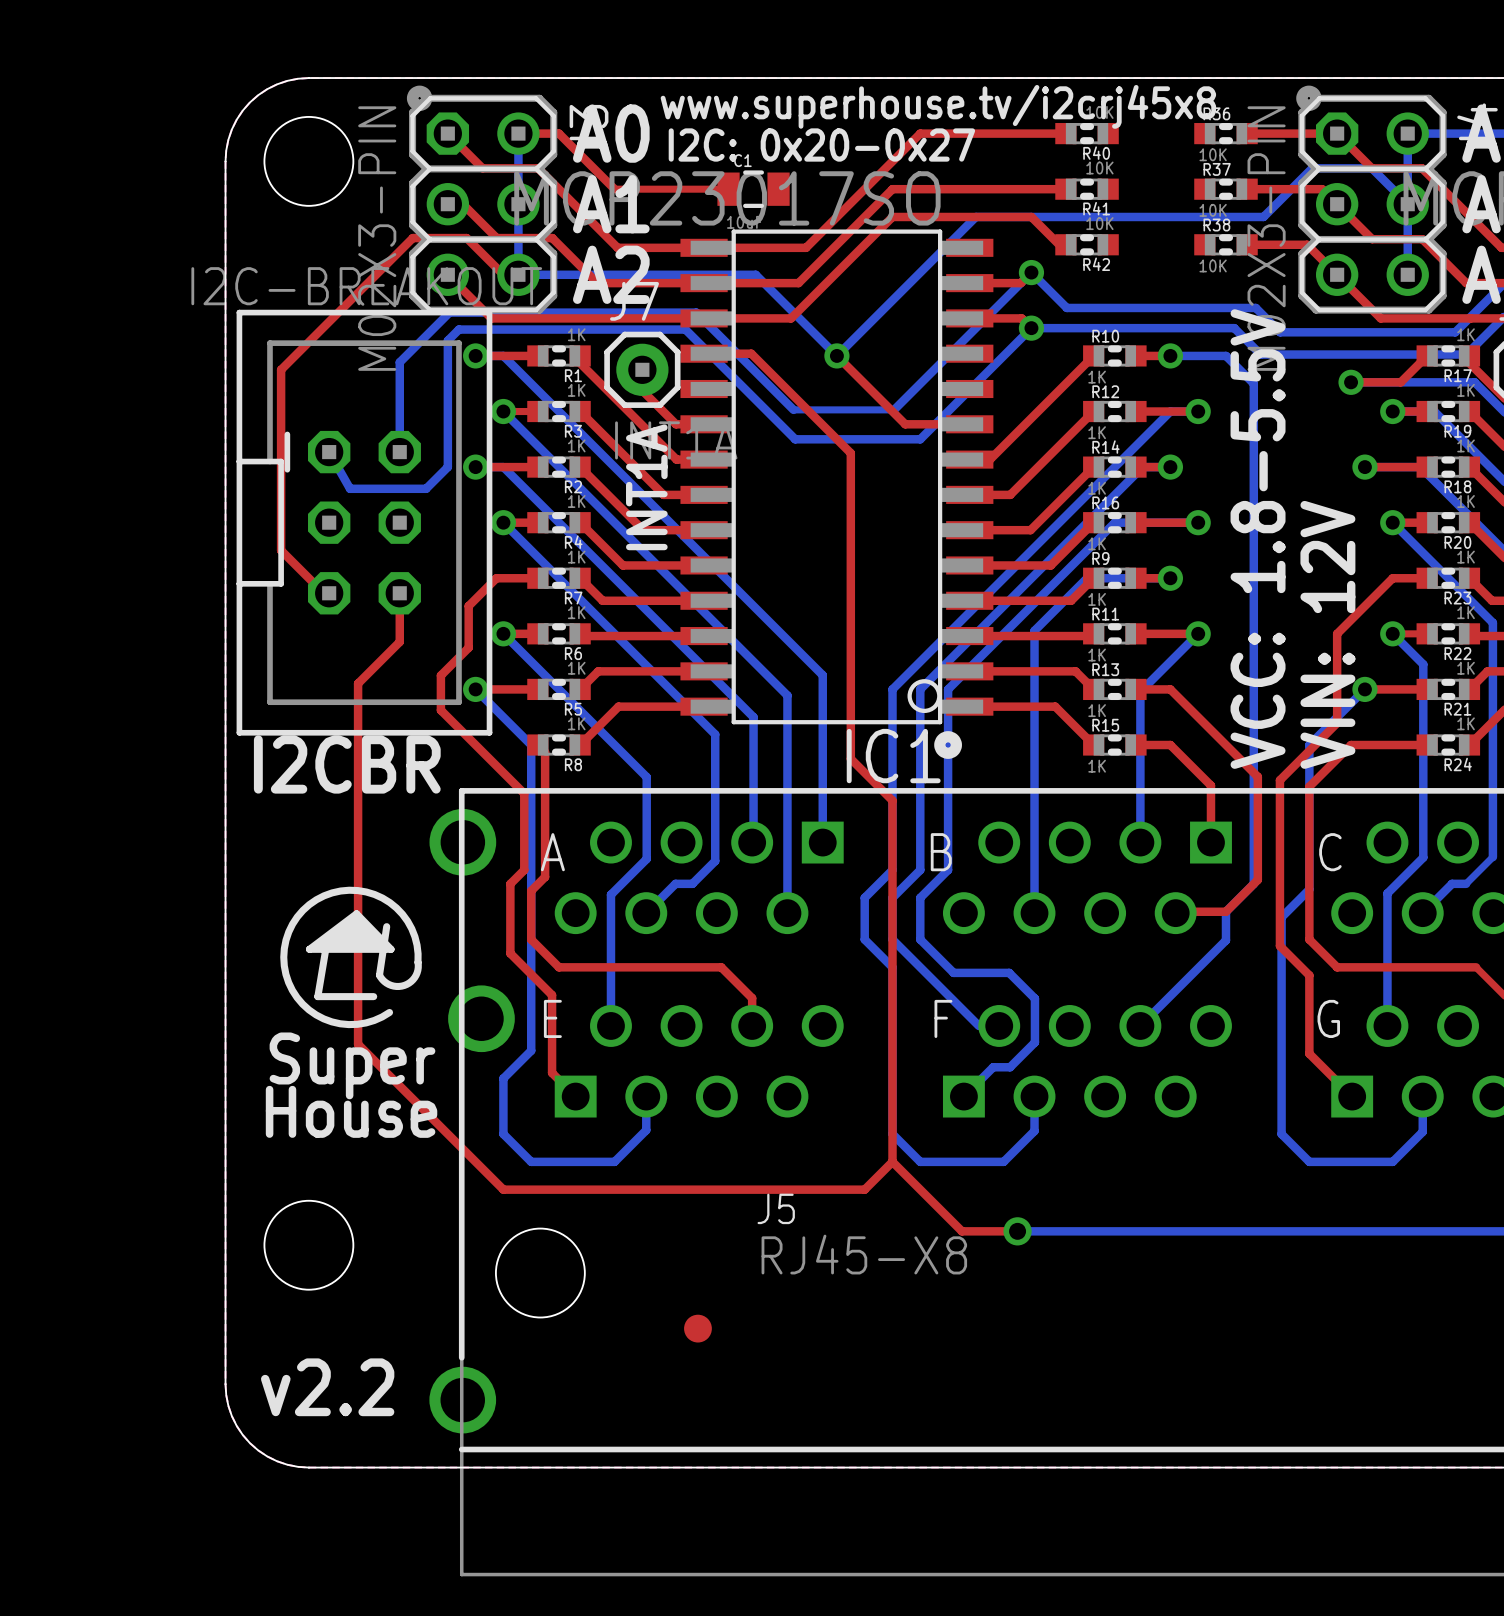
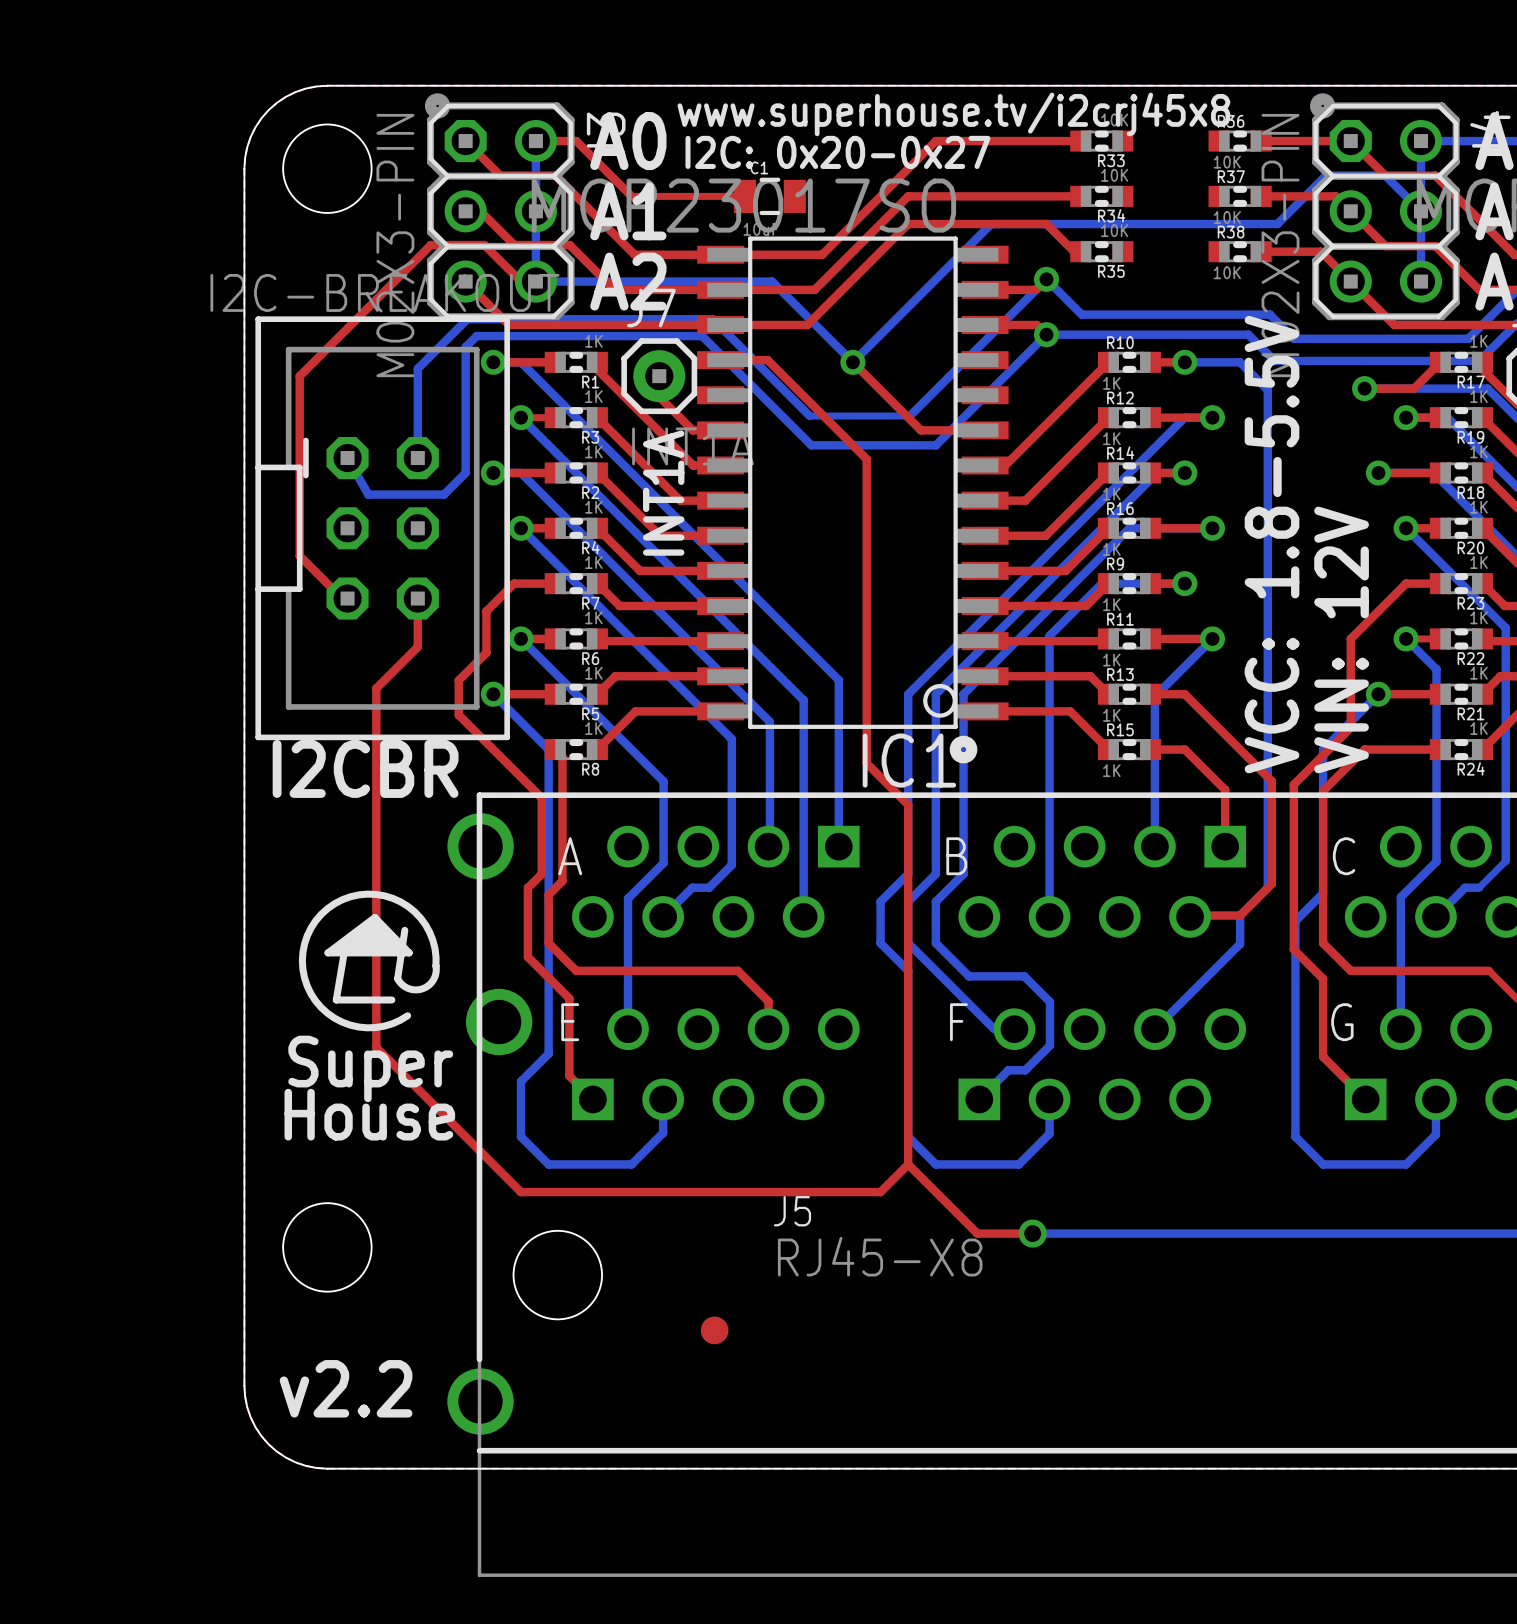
R40 name: R40 (1096, 153) -> R33 (1111, 160)
R41 name: R41 (1096, 208) -> R34 (1111, 215)
R42 name: R42 (1096, 264) -> R35 (1111, 271)

